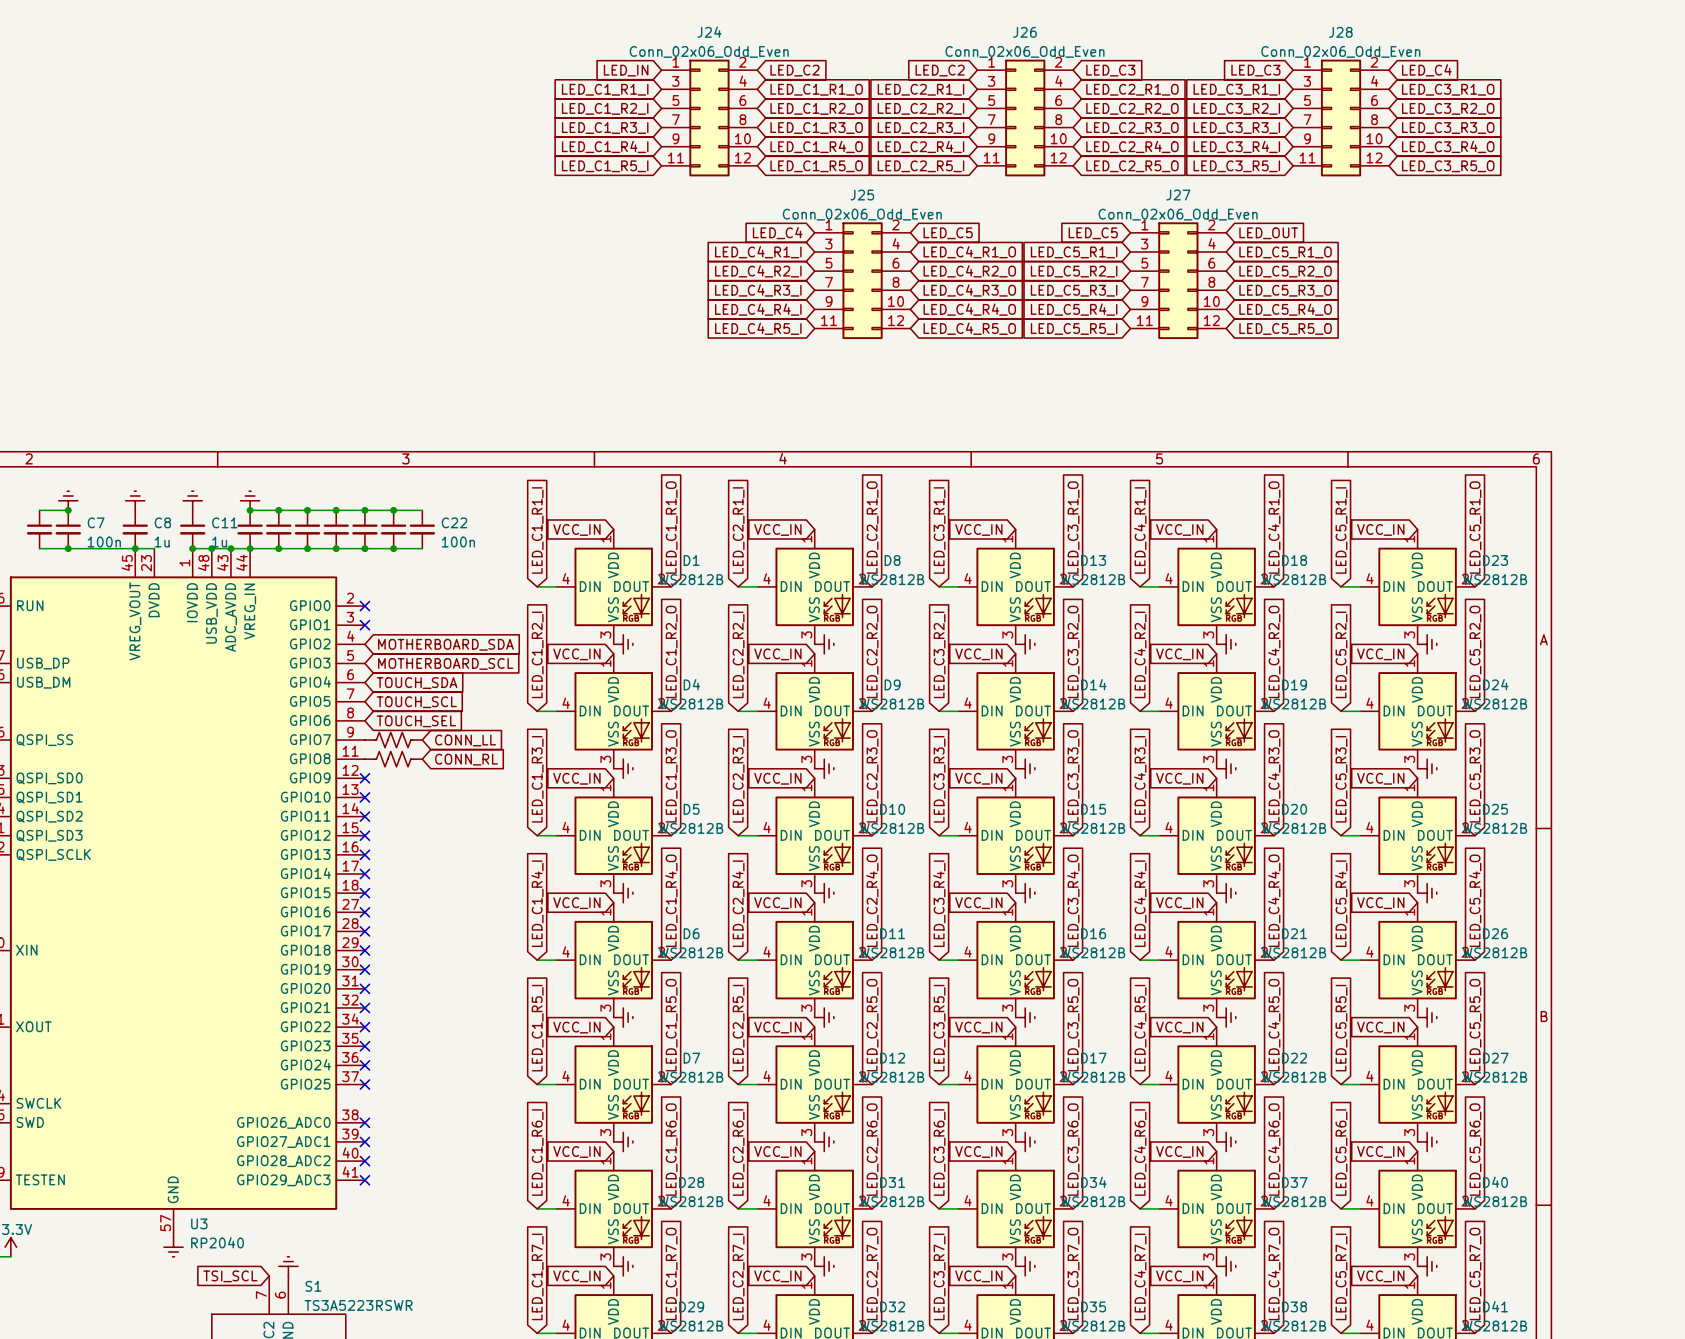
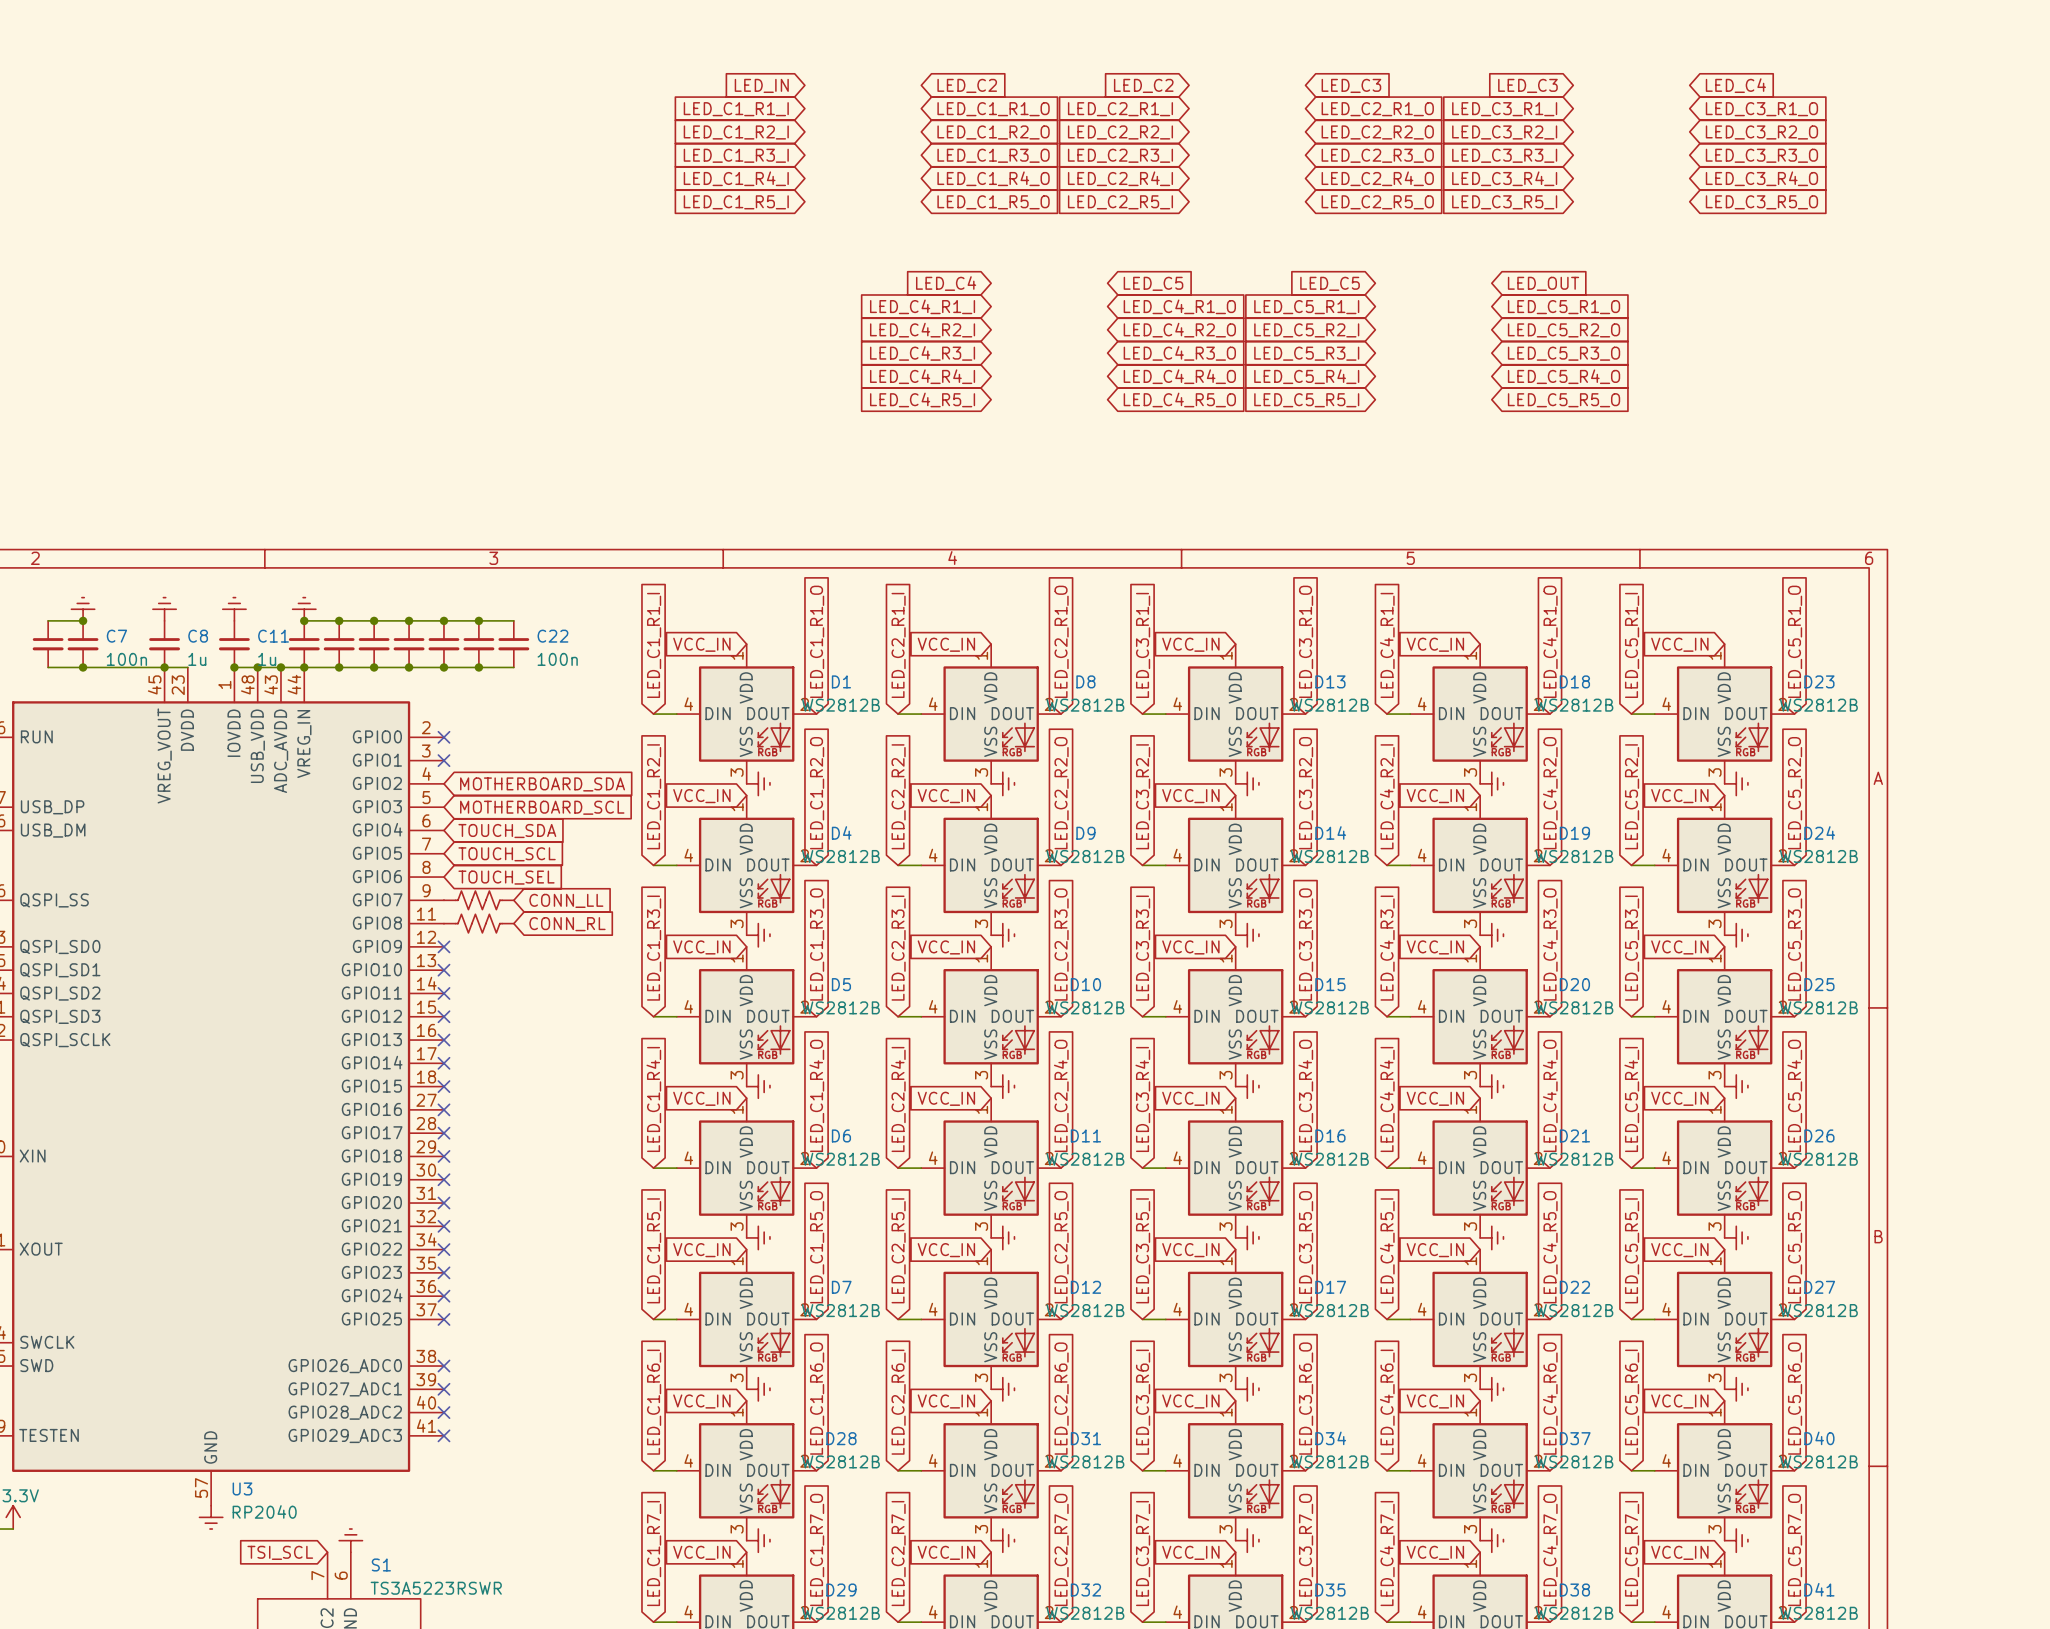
J24: Conn_02x06_Odd_Even (709, 118) -> none
J26: Conn_02x06_Odd_Even (1025, 118) -> none
J28: Conn_02x06_Odd_Even (1341, 118) -> none
J25: Conn_02x06_Odd_Even (862, 280) -> none
J27: Conn_02x06_Odd_Even (1178, 280) -> none

